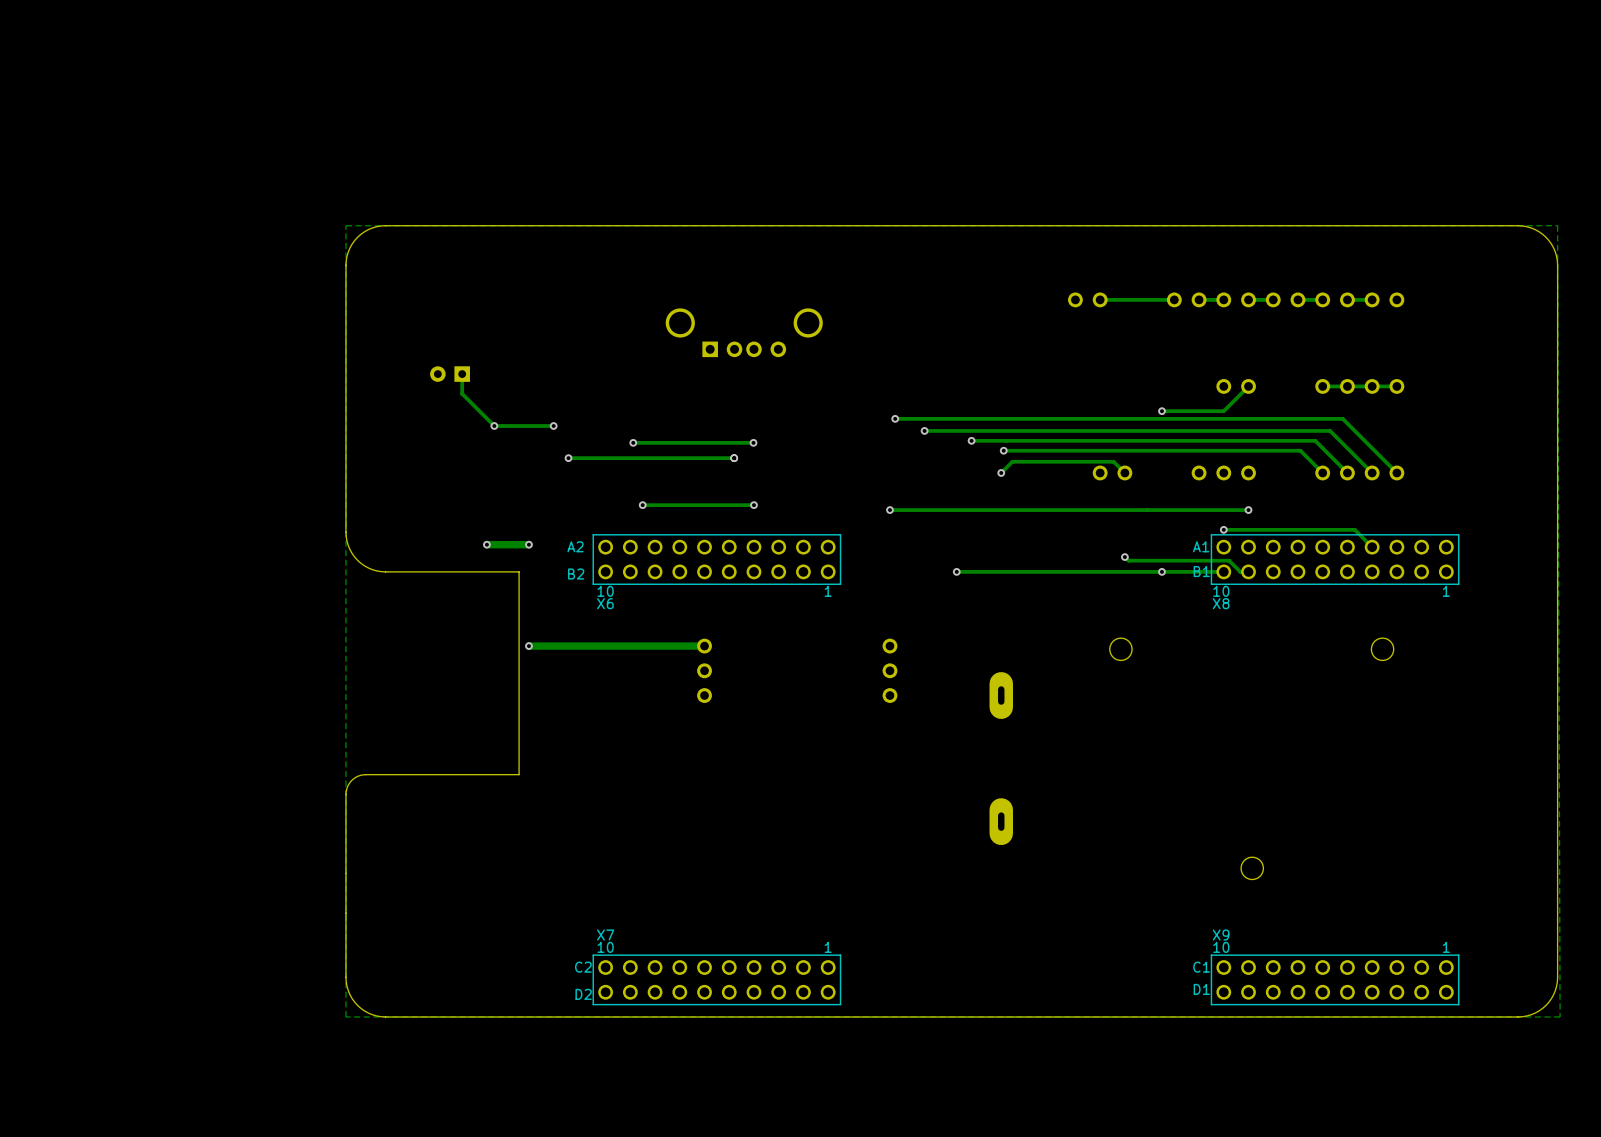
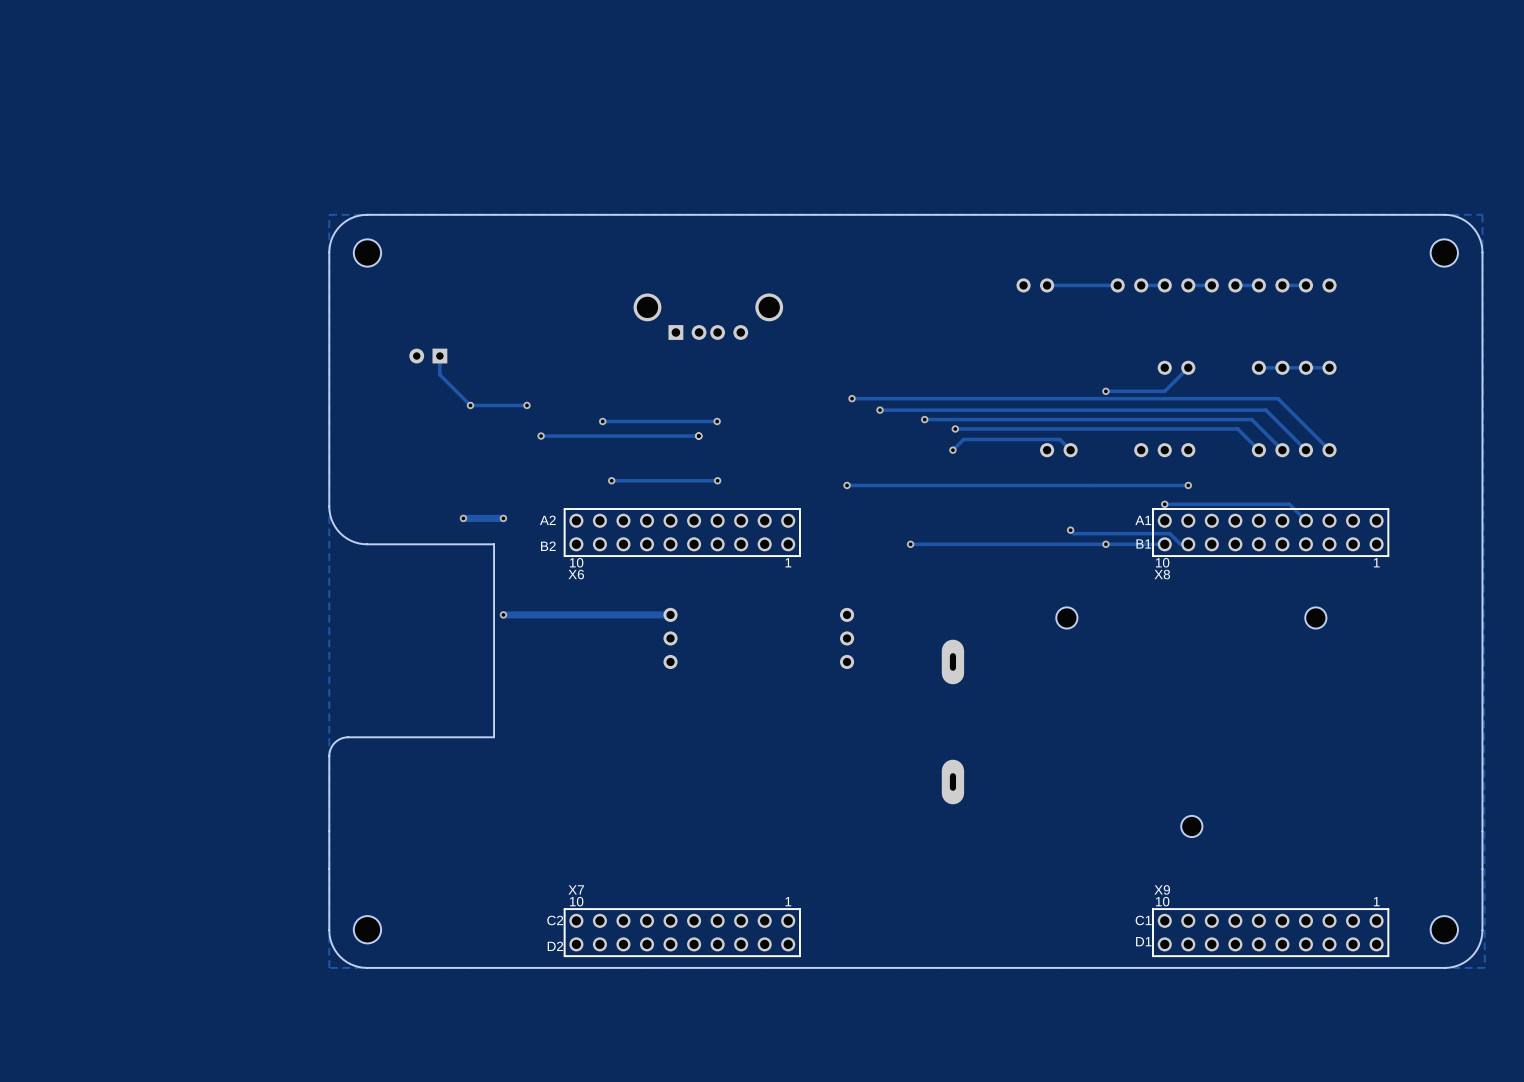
part: none -> (367, 252)
part: none -> (1444, 252)
part: none -> (367, 929)
part: none -> (1444, 929)

